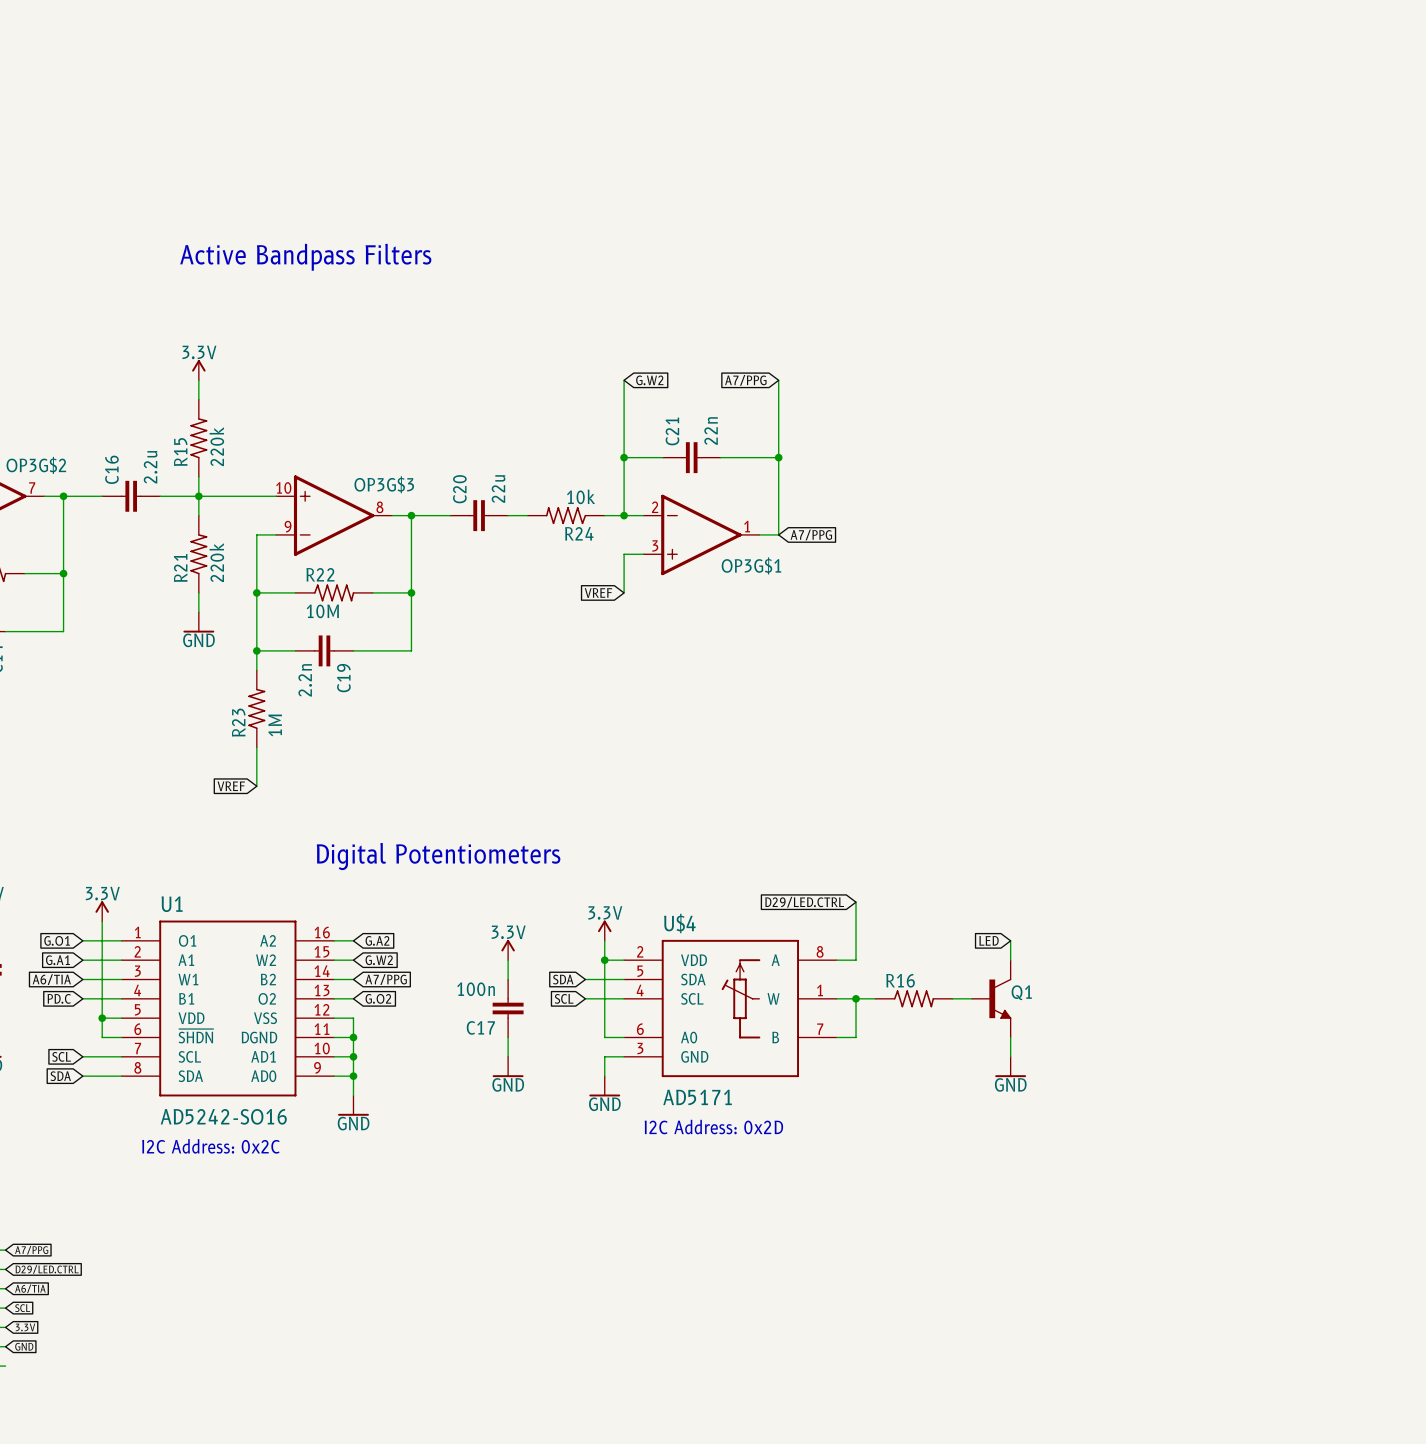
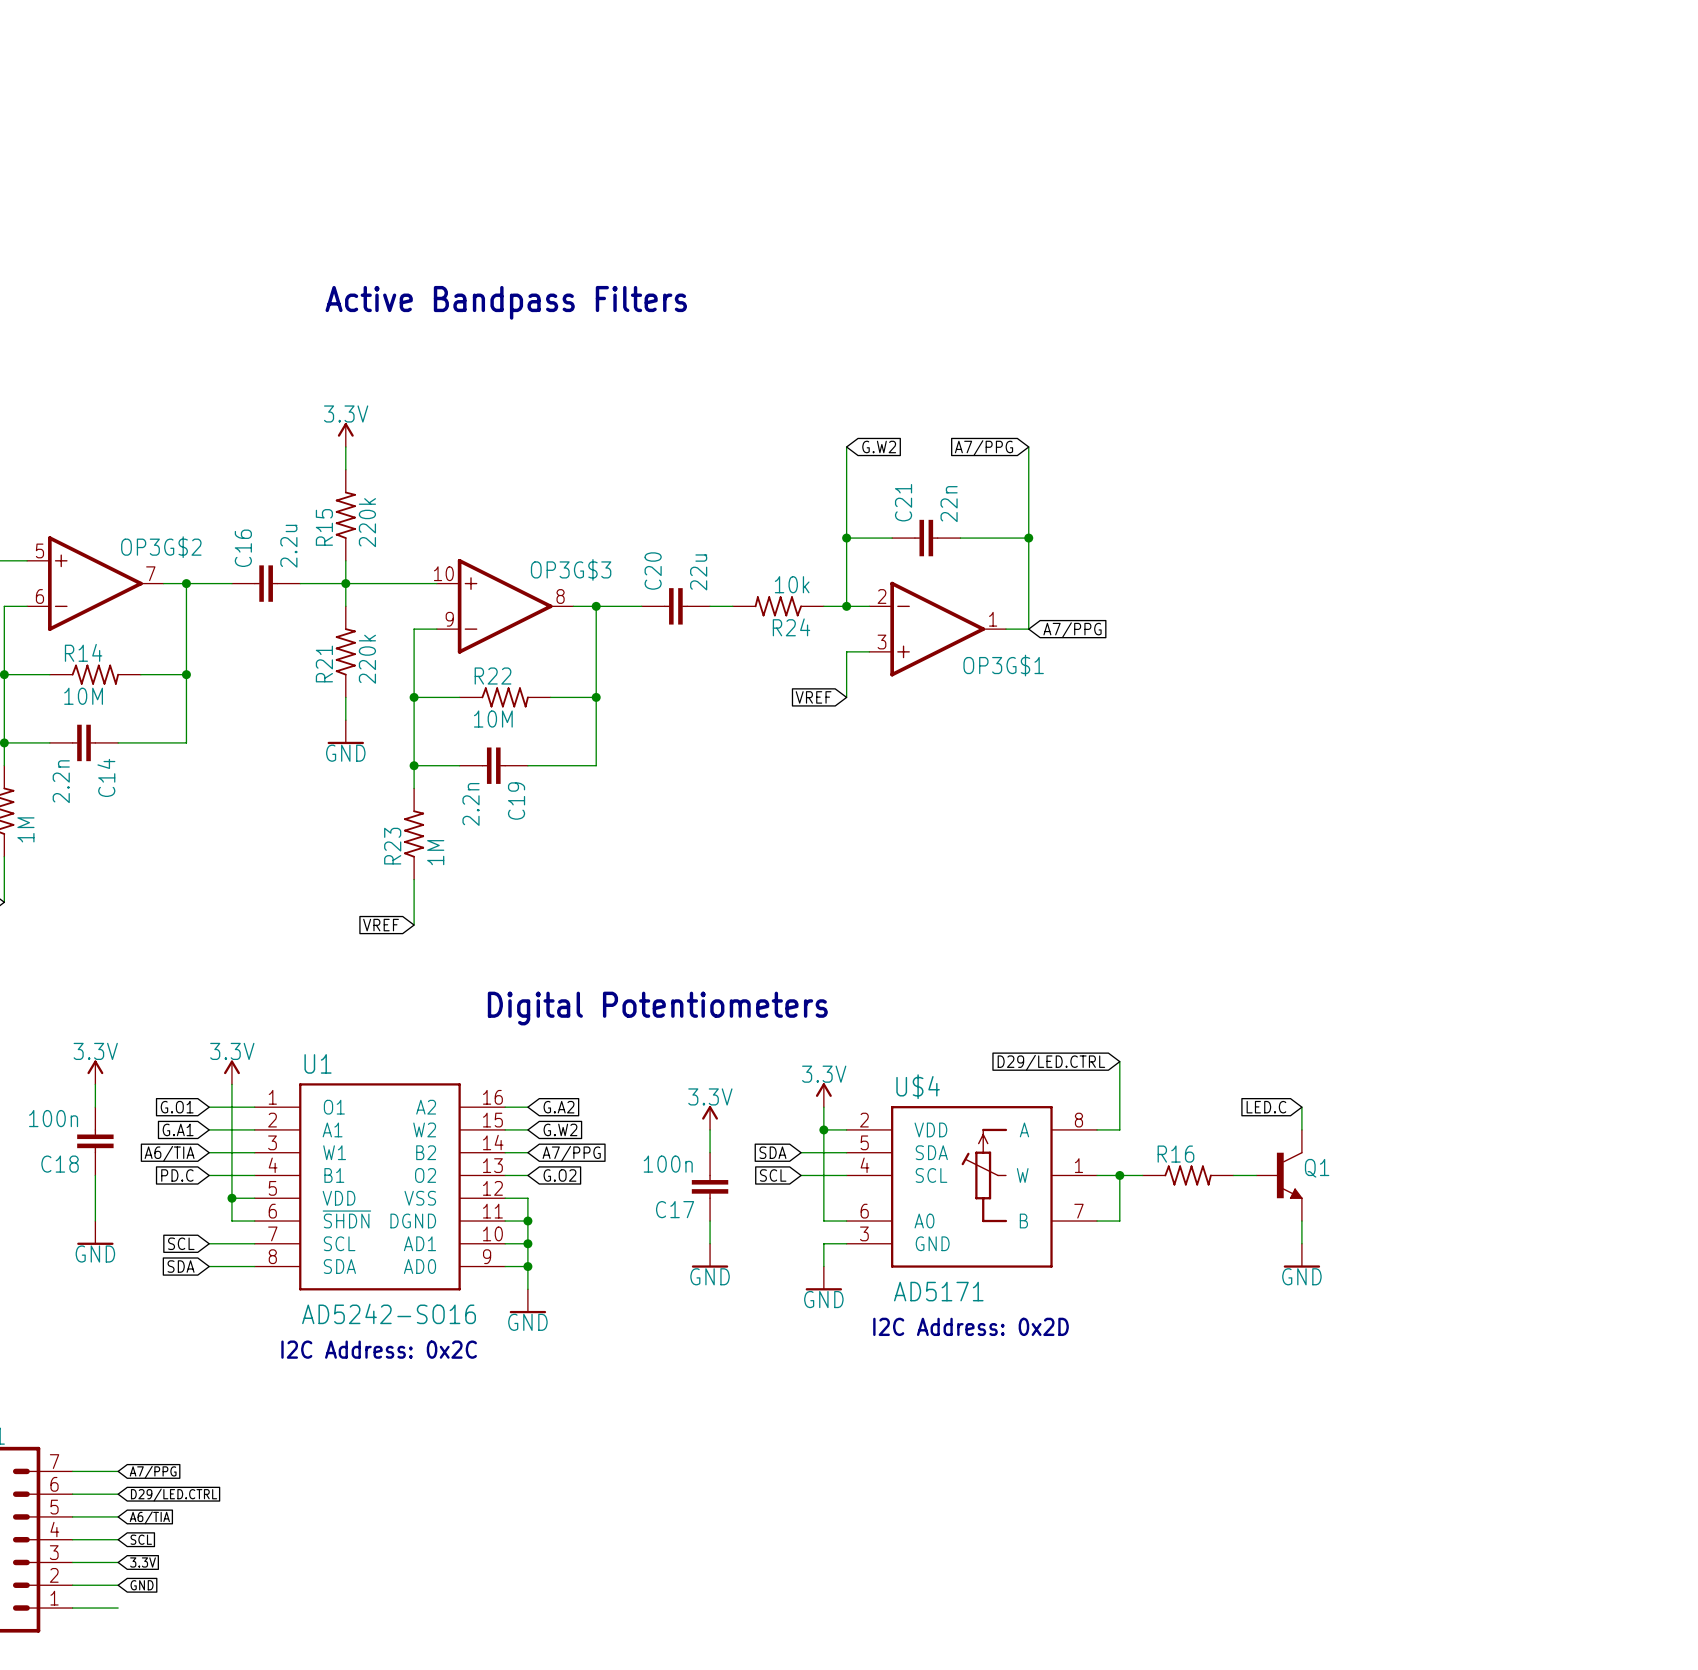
global label: LED (989, 940) -> LED.C (1266, 1107)

